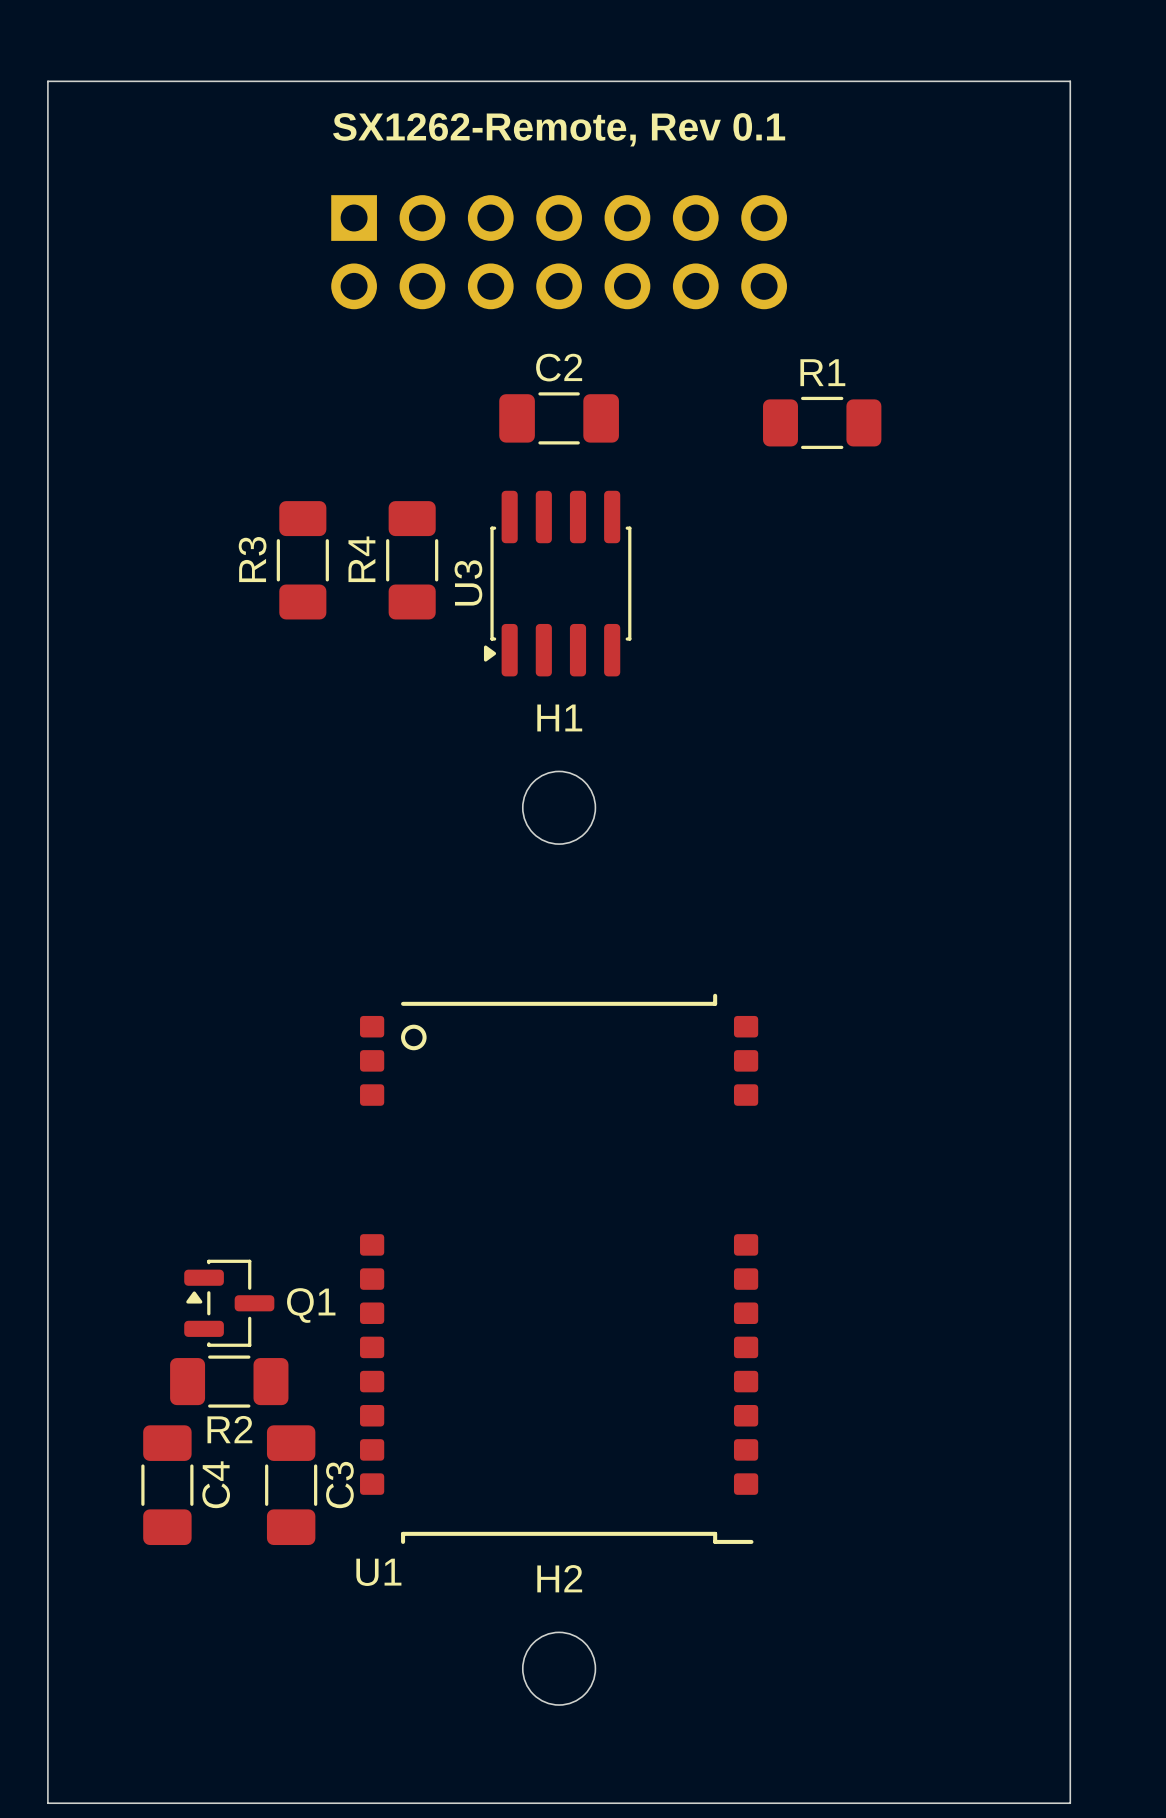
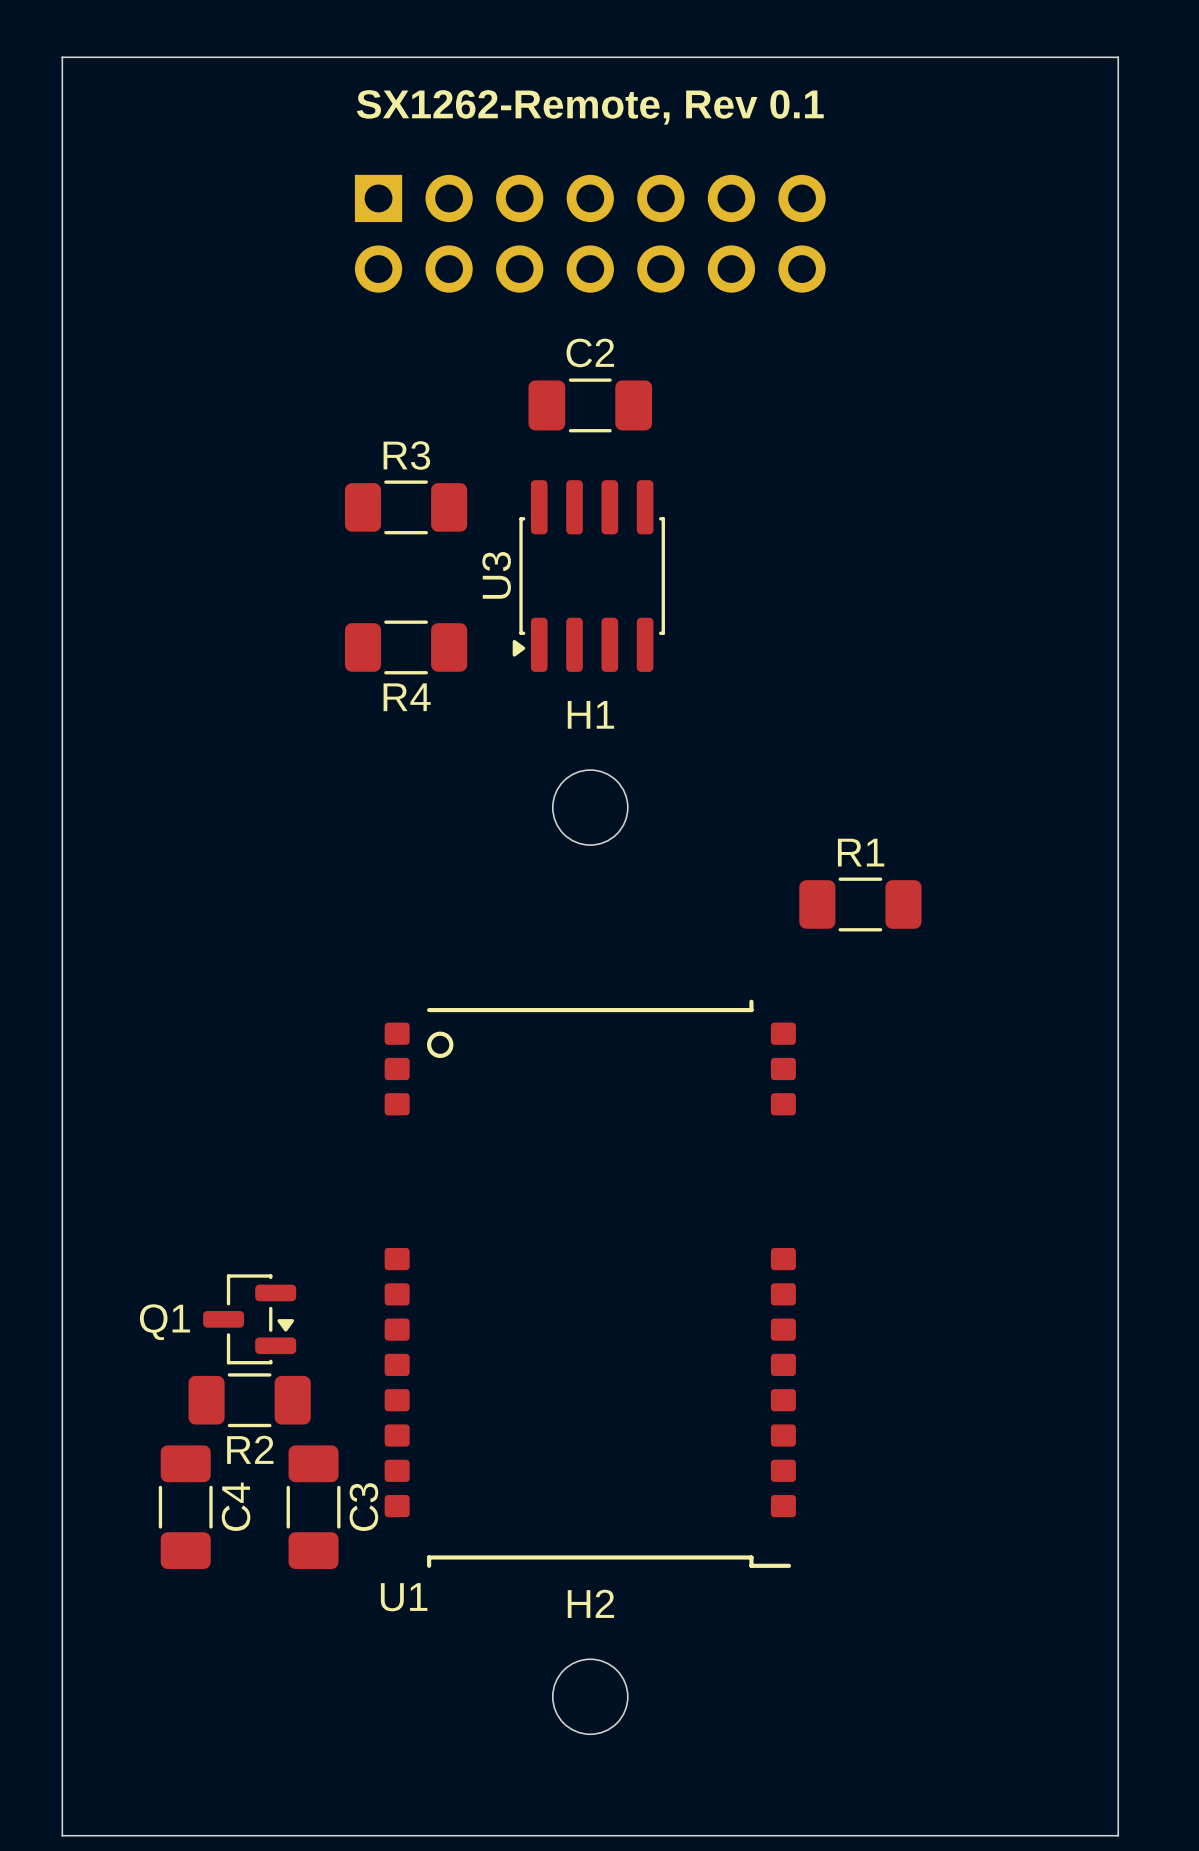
R1 position: (822, 422) -> (860, 904)
R4 name position: R4 (361, 559) -> R4 (407, 697)
R3 rotation: 0° (302, 560) -> 90° clockwise (406, 507)
R3 position: (302, 560) -> (406, 507)
R4 rotation: 0° (412, 560) -> 90° clockwise (406, 647)
R4 position: (412, 560) -> (406, 647)
Q1 rotation: 0° (229, 1303) -> 180° (249, 1319)

